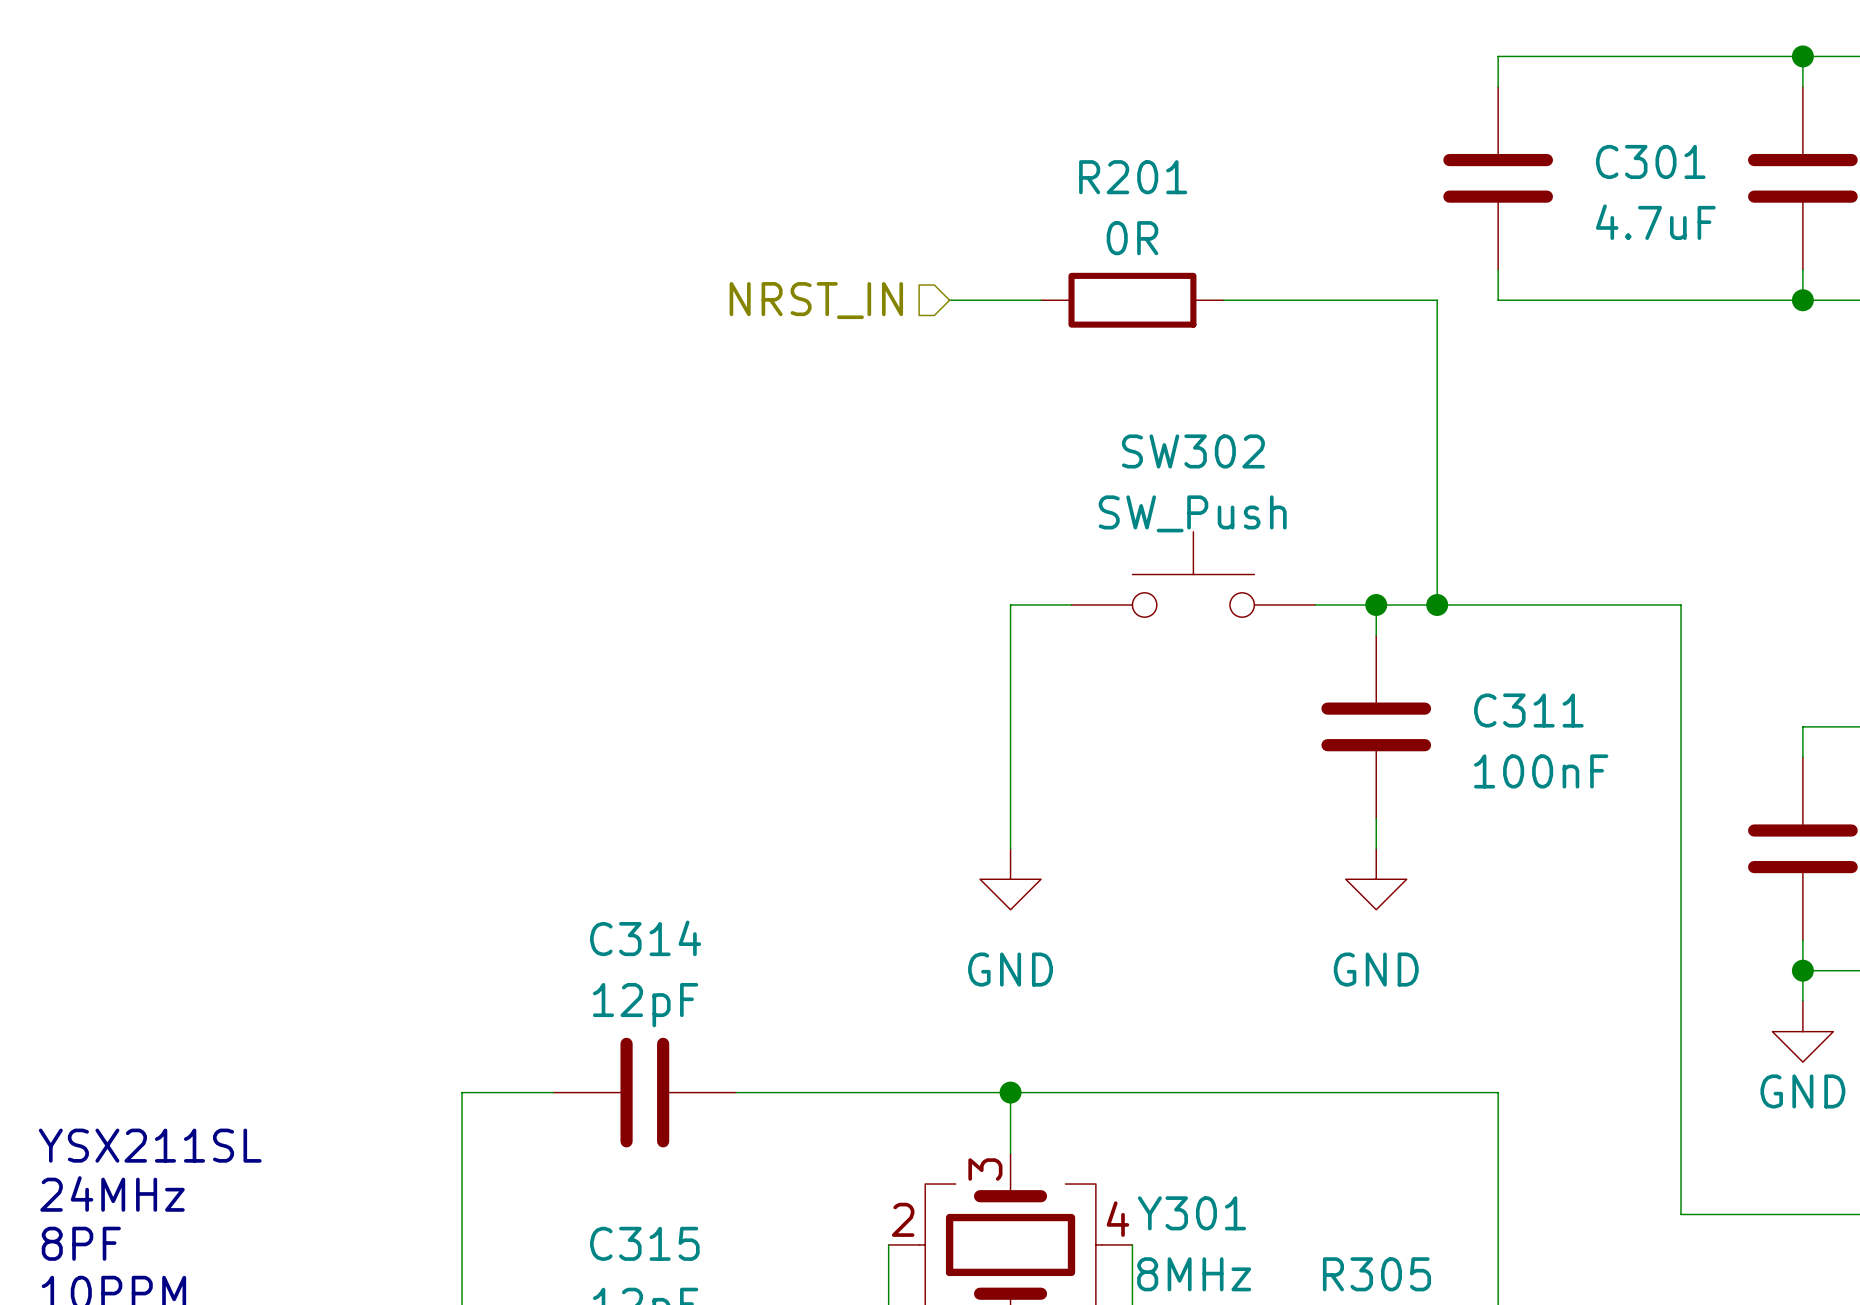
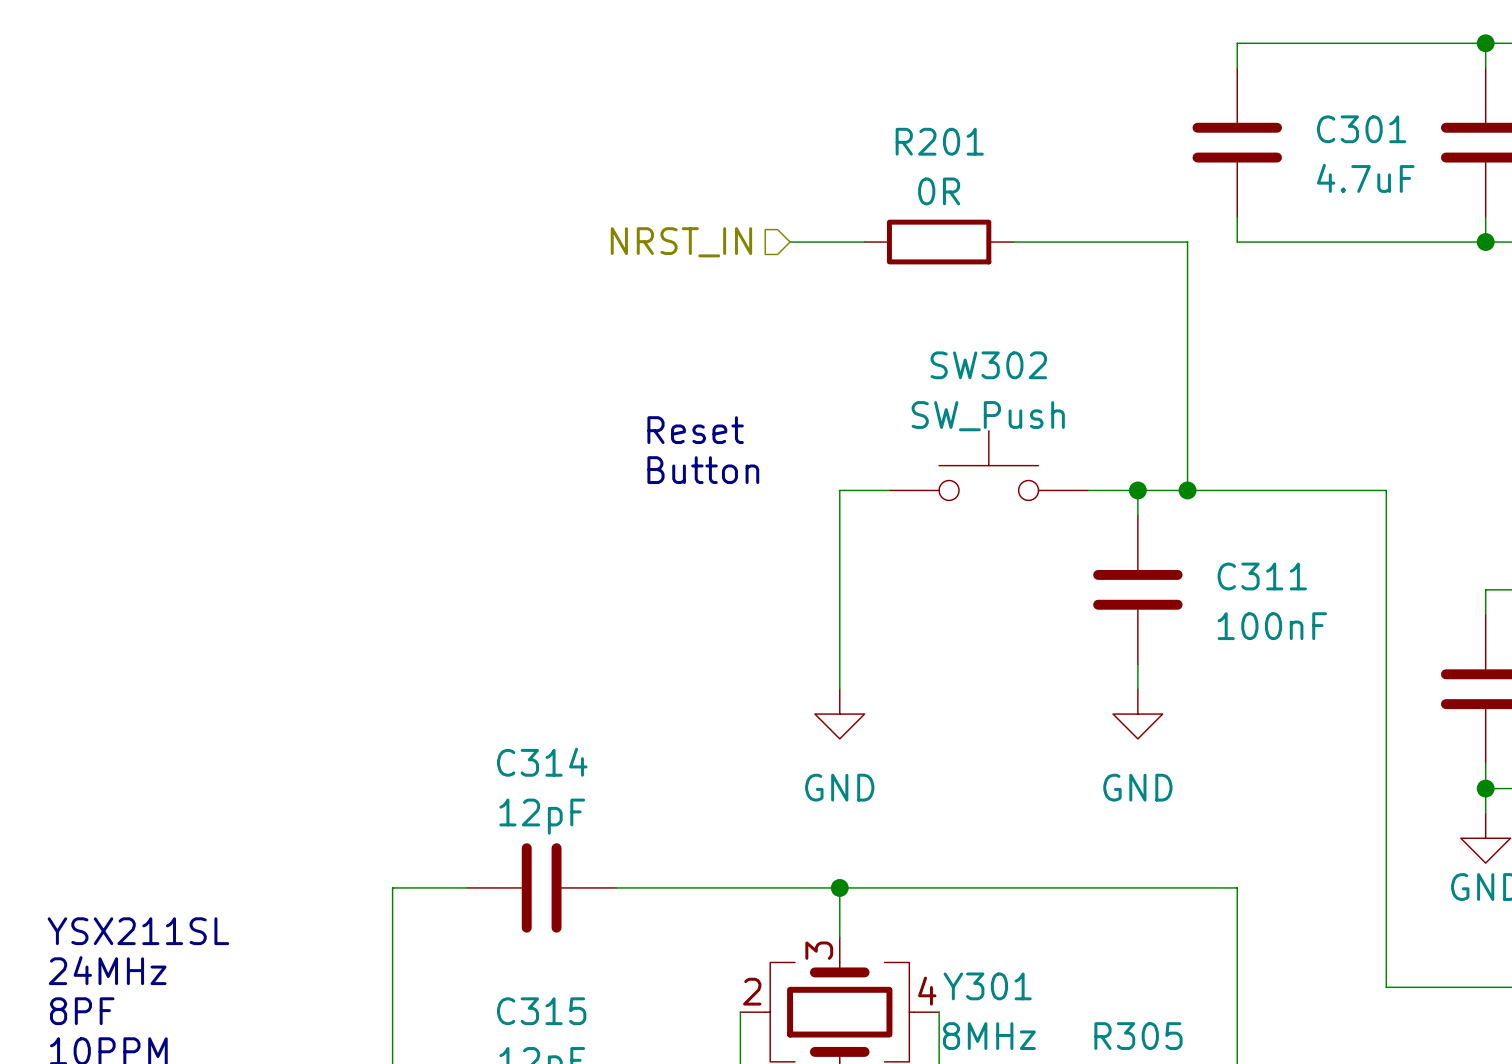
text: none -> Reset (695, 430)
text: none -> Button (703, 470)

